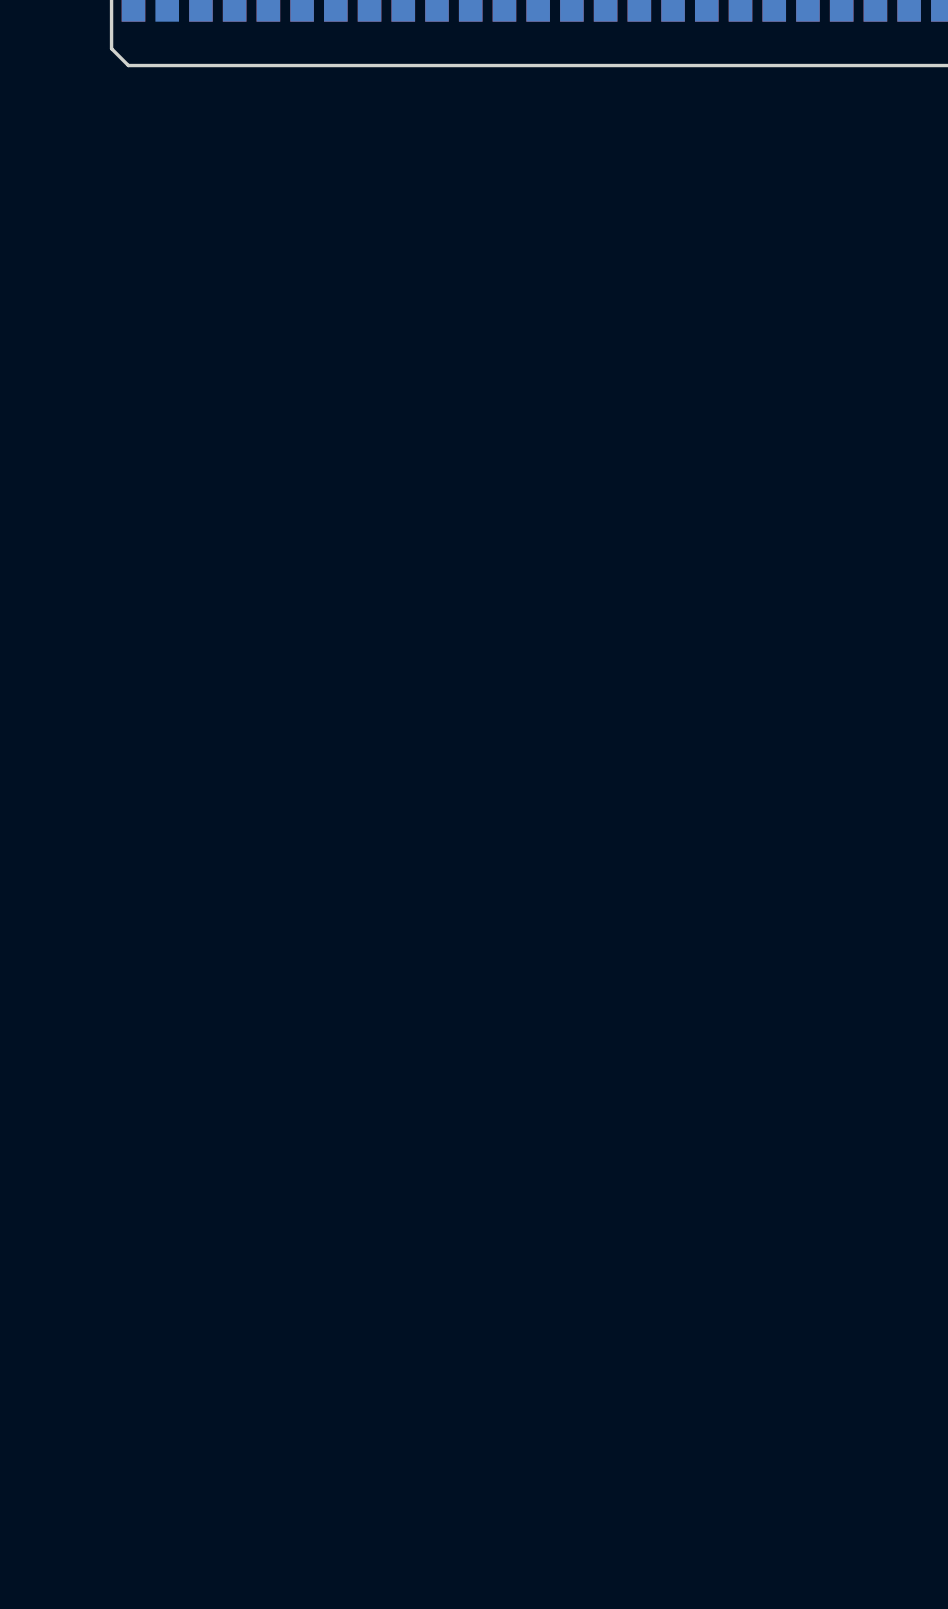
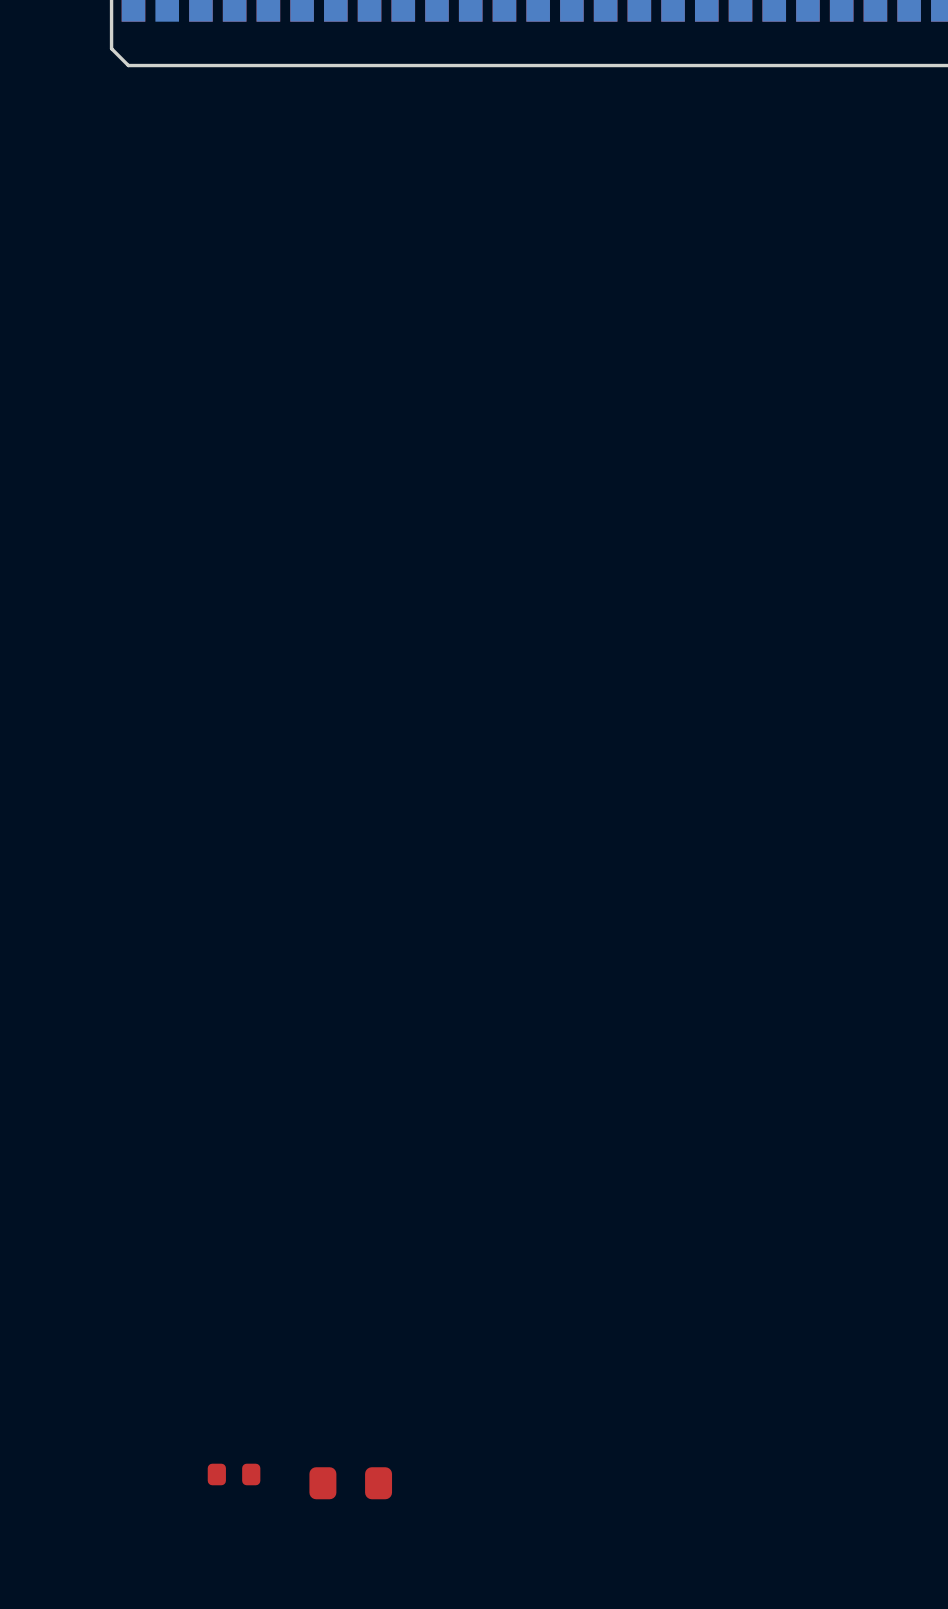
part: none -> (234, 1474)
part: none -> (350, 1483)

